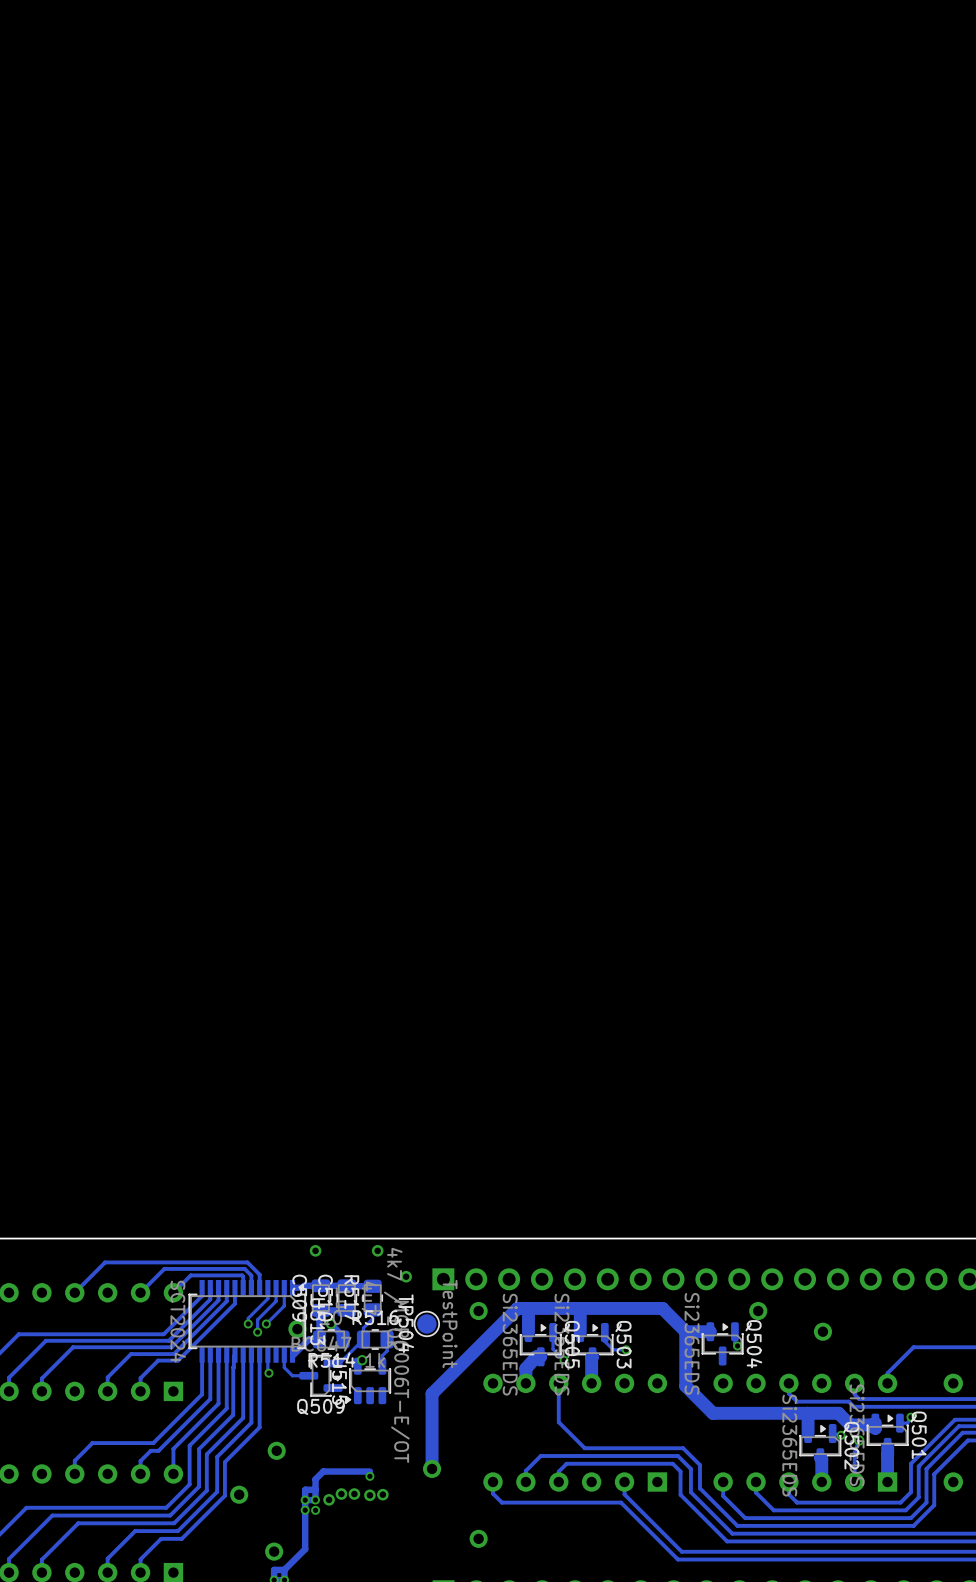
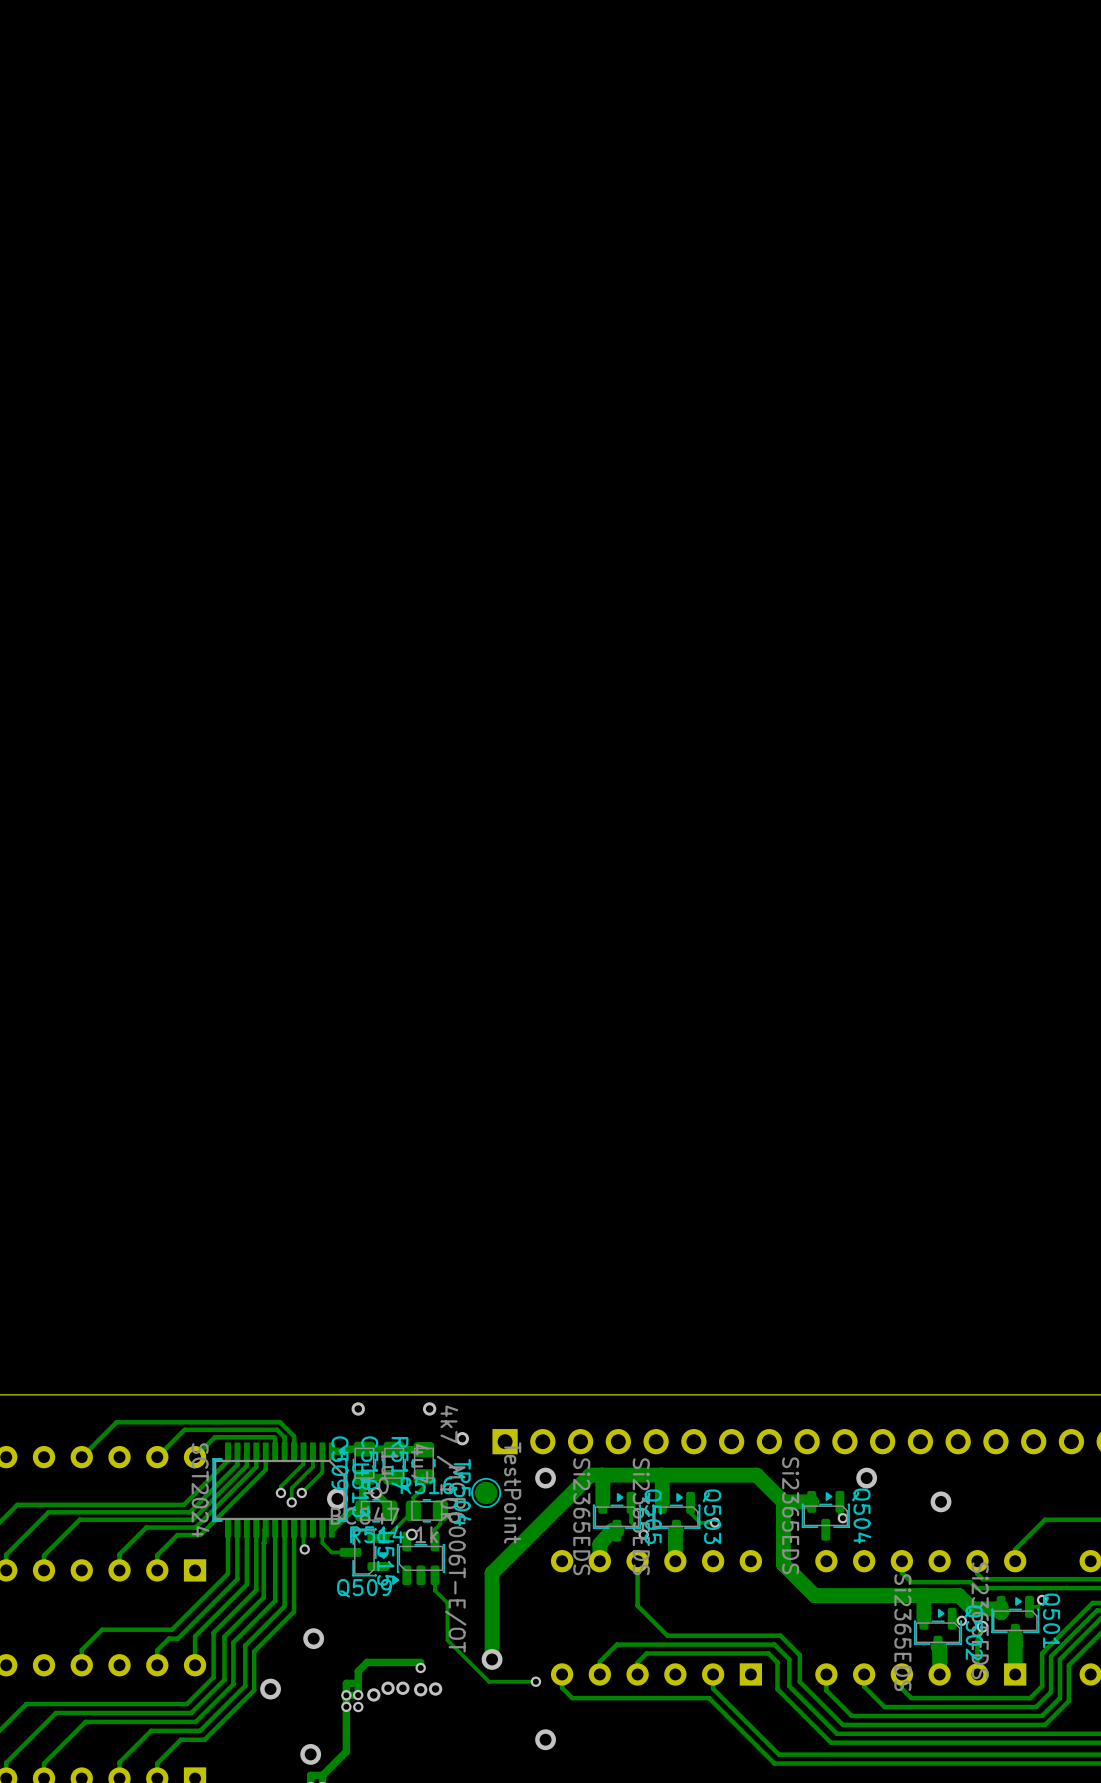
track: none -> (435, 1575) (435, 1590) (447, 1602) (447, 1640) (489, 1681) (535, 1681)
via: none -> (535, 1681)

